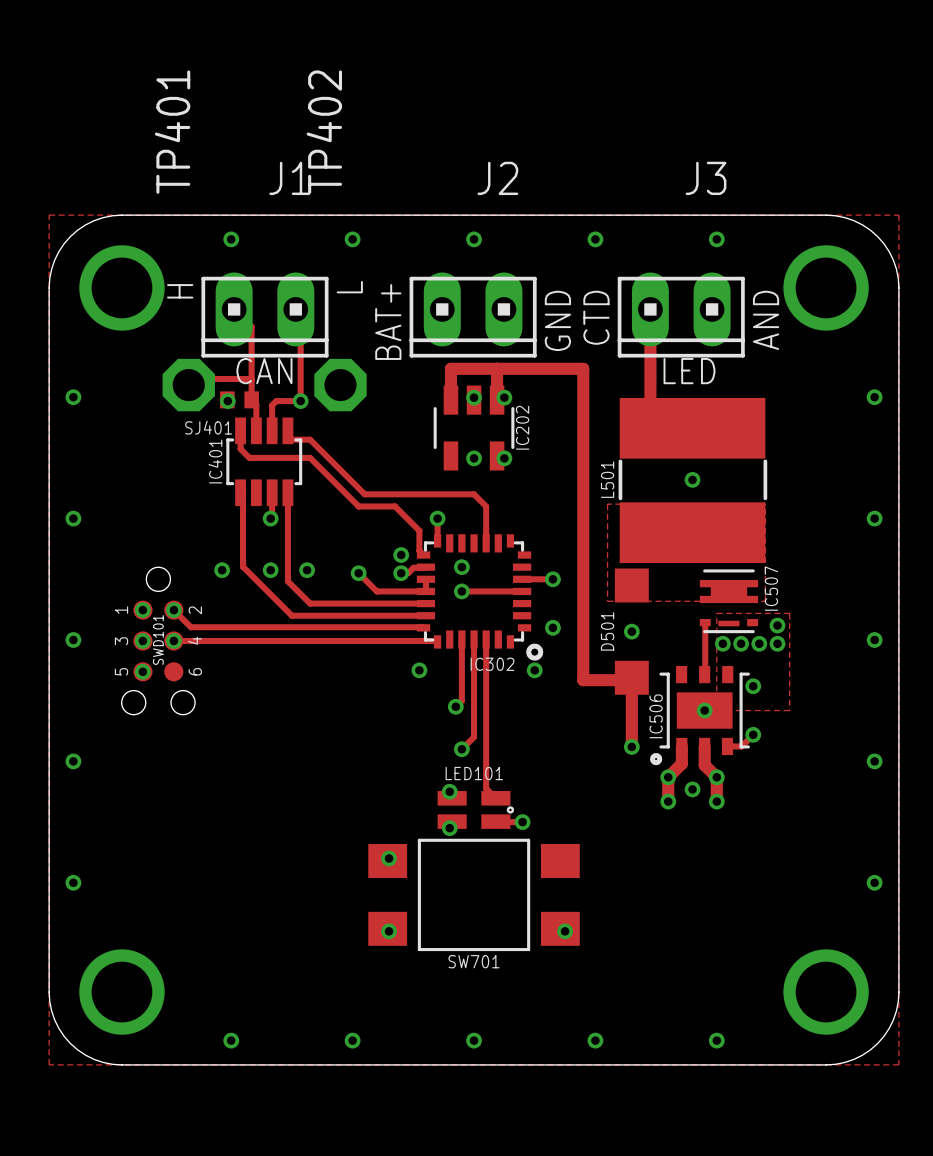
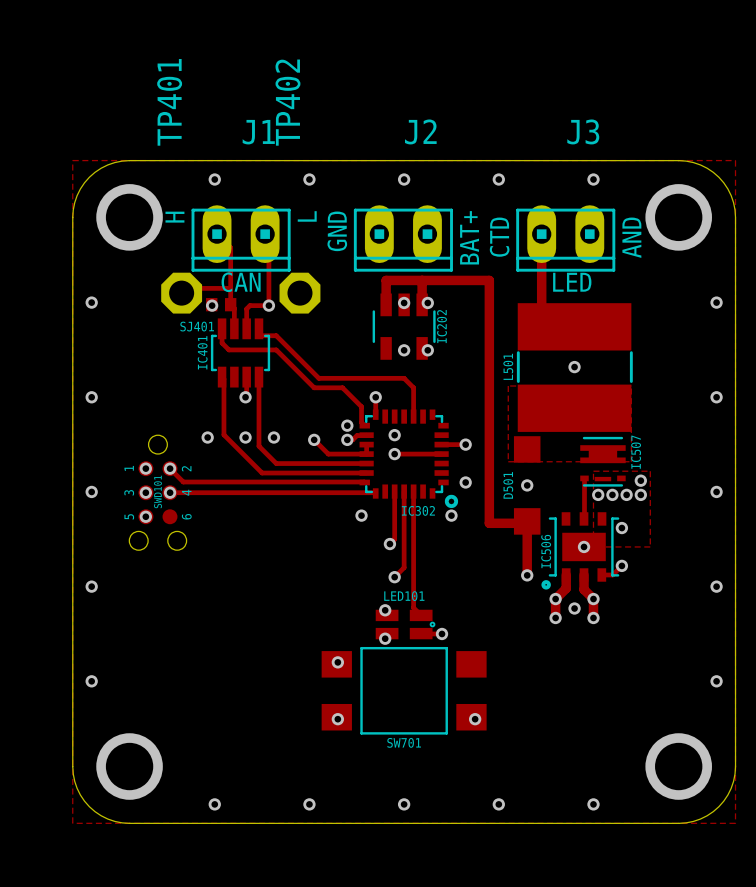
text: GND (557, 320) -> BAT+ (469, 237)
text: BAT+ (388, 322) -> GND (337, 231)

